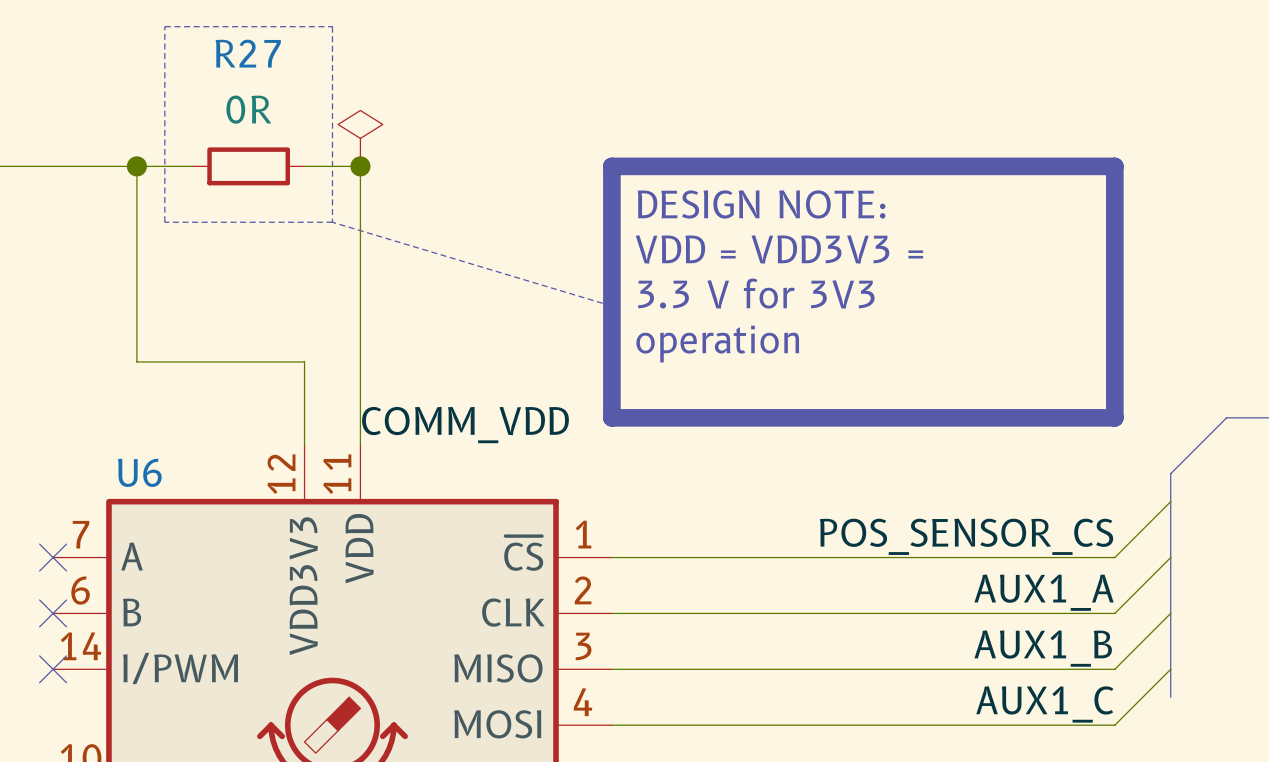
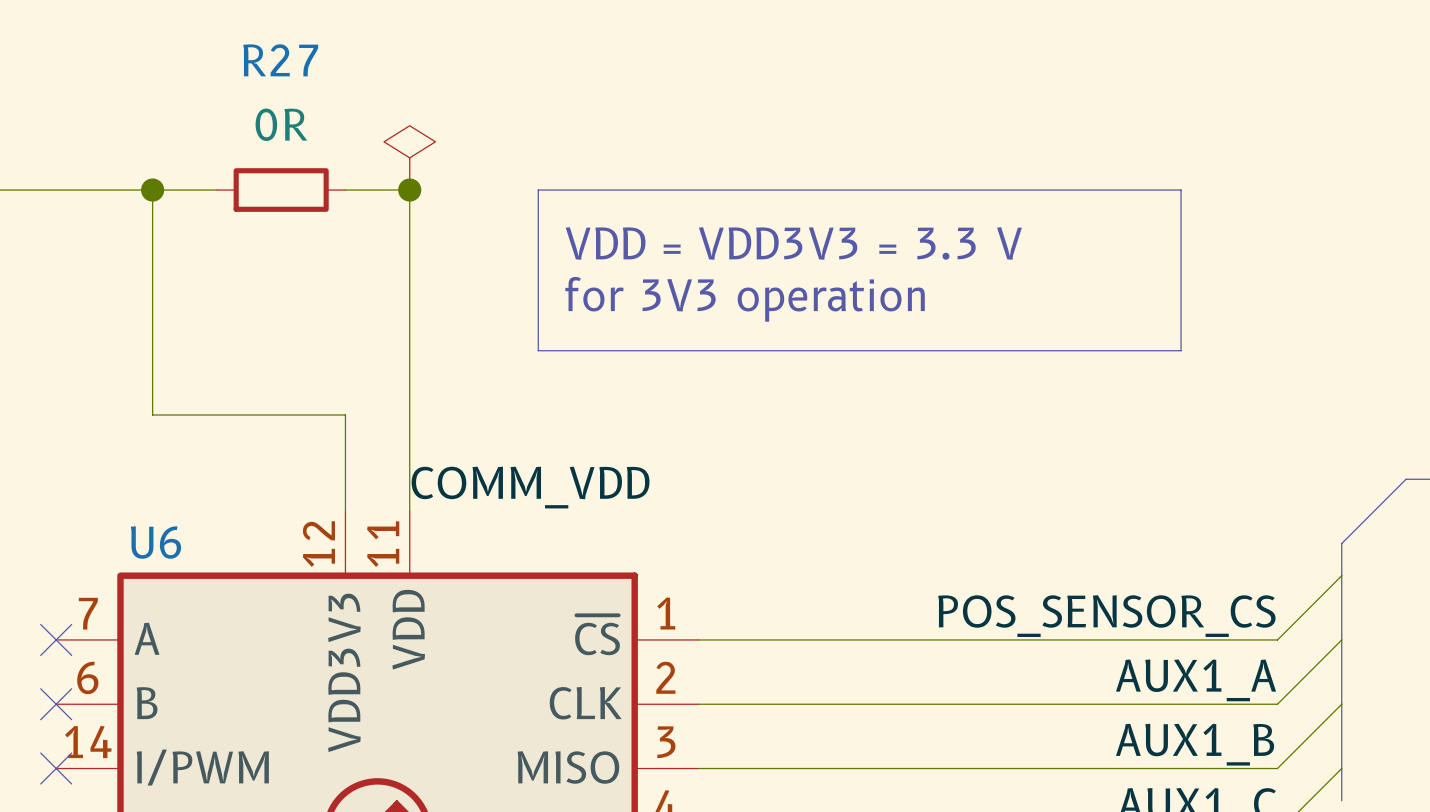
line: (611, 166) (611, 417) (1114, 417) (1114, 166) (1031, 166) -> (698, 190) (538, 190) (538, 350) (1181, 350) (1181, 190)
line width: thick (611, 166) (1031, 166) -> thin (698, 190) (1181, 190)
text: DESIGN NOTE: (761, 204) -> none
line: (332, 222) (611, 306) -> none
line: (332, 222) (332, 26) (164, 26) (164, 222) (332, 222) -> none
text: VDD = VDD3V3 = (779, 249) -> VDD = VDD3V3 = 3.3 V (793, 243)
text: none -> for 3V3 operation (745, 299)
text: 3.3 V for 3V3 (756, 293) -> none
text: operation (717, 344) -> none

